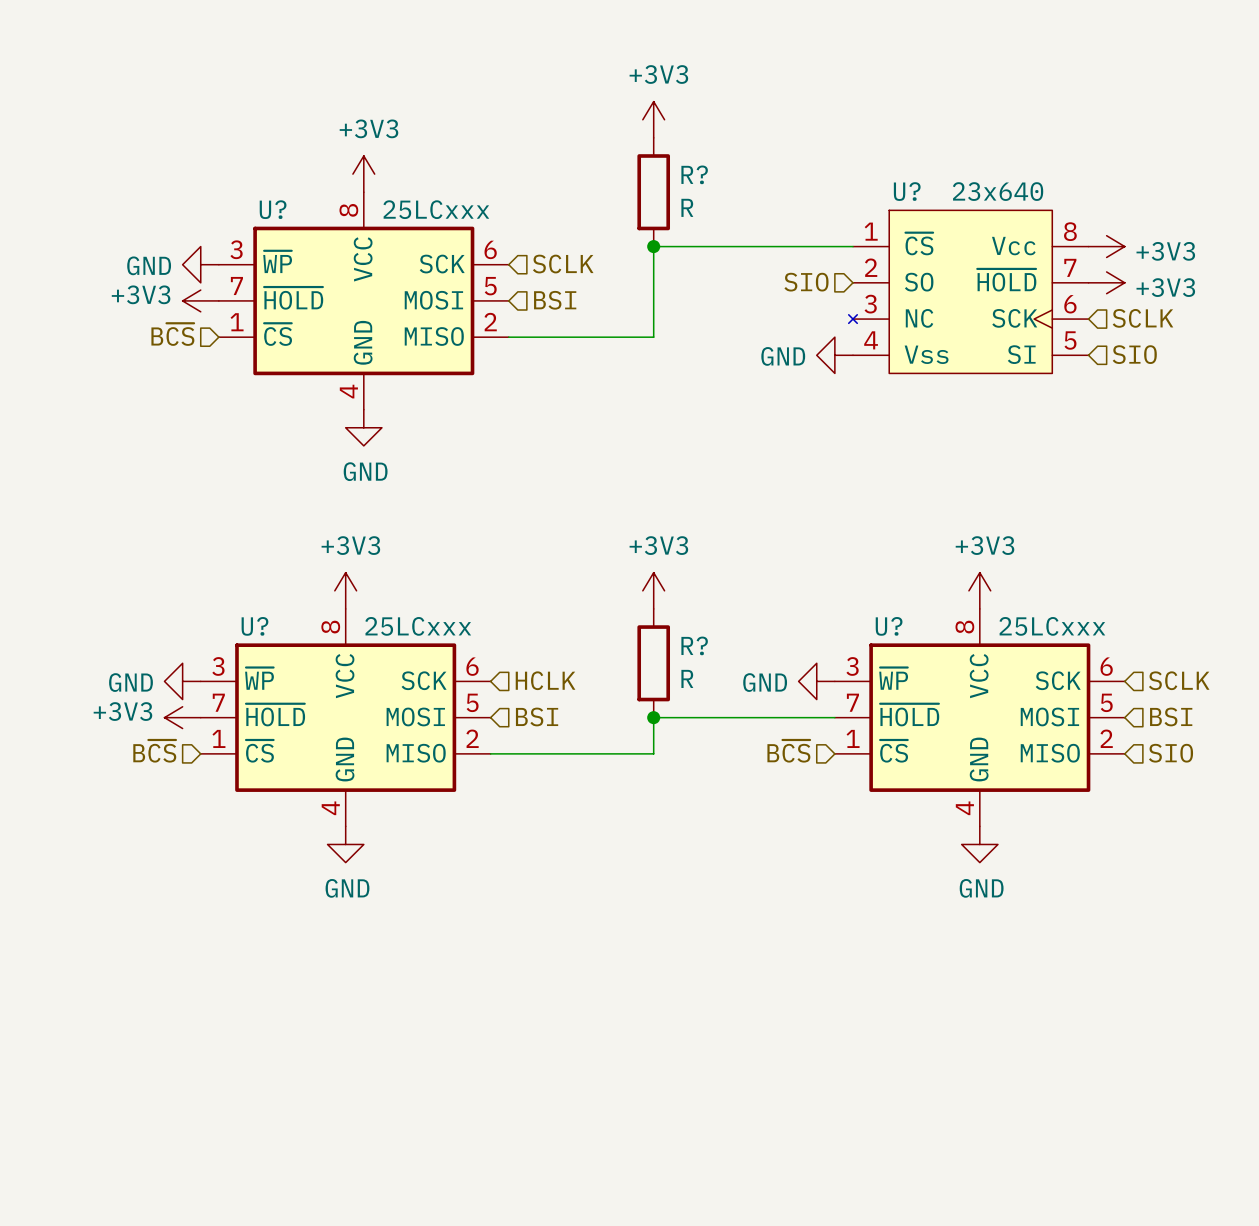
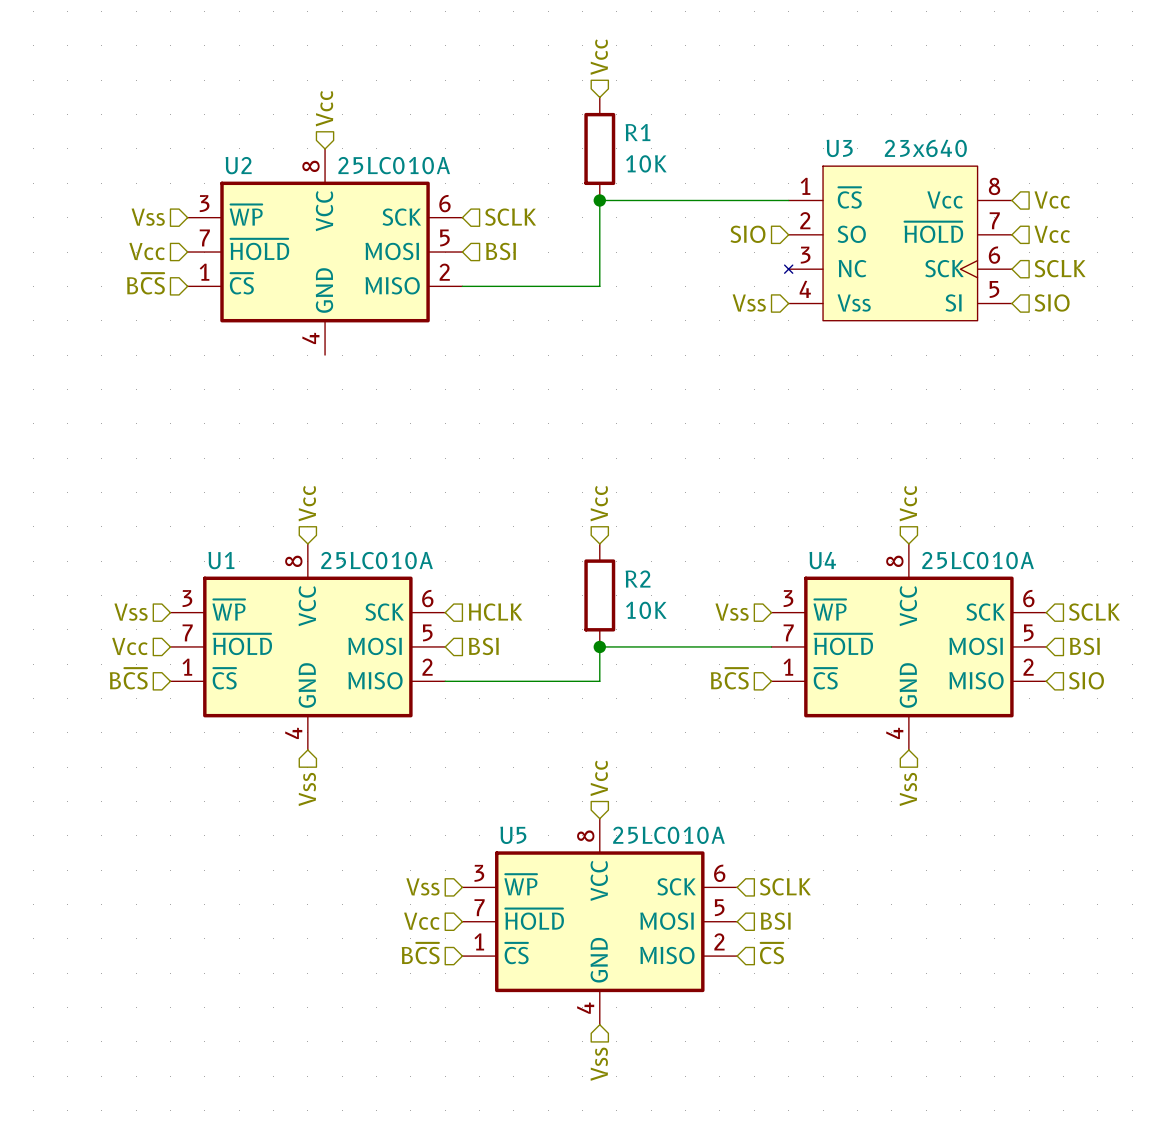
hierarchical label: none -> Vcc (599, 57)
power symbol: +3V3 (653, 119) -> none
hierarchical label: none -> Vcc (324, 108)
power symbol: +3V3 (363, 174) -> none
R? name: R? (694, 174) -> R1 (637, 132)
U? name: U? (907, 191) -> U3 (839, 148)
R? value: R (687, 207) -> 10K (646, 163)
U? name: U? (273, 209) -> U2 (238, 165)
U? value: 25LCxxx (436, 209) -> 25LC010A (394, 165)
power symbol: +3V3 (1106, 246) -> none
hierarchical label: none -> Vcc (1052, 199)
hierarchical label: none -> Vss (148, 217)
power symbol: GND (200, 264) -> none
power symbol: +3V3 (1106, 282) -> none
hierarchical label: none -> Vcc (1052, 234)
hierarchical label: none -> Vcc (147, 251)
power symbol: +3V3 (200, 300) -> none
hierarchical label: none -> Vss (749, 302)
power symbol: GND (834, 355) -> none
power symbol: GND (363, 427) -> none
hierarchical label: none -> Vcc (307, 503)
hierarchical label: none -> Vcc (599, 503)
hierarchical label: none -> Vcc (908, 503)
power symbol: +3V3 (345, 590) -> none
power symbol: +3V3 (653, 590) -> none
power symbol: +3V3 (979, 590) -> none
U? name: U? (254, 626) -> U1 (221, 560)
U? value: 25LCxxx (418, 626) -> 25LC010A (377, 560)
U? name: U? (889, 626) -> U4 (822, 560)
U? value: 25LCxxx (1052, 626) -> 25LC010A (978, 560)
R? name: R? (694, 645) -> R2 (638, 579)
R? value: R (687, 678) -> 10K (646, 610)
hierarchical label: none -> Vss (131, 612)
hierarchical label: none -> Vss (732, 612)
power symbol: GND (182, 681) -> none
power symbol: GND (816, 681) -> none
hierarchical label: none -> Vcc (129, 646)
power symbol: +3V3 (182, 717) -> none
power symbol: GND (345, 844) -> none
power symbol: GND (979, 844) -> none
hierarchical label: none -> Vcc (599, 778)
hierarchical label: none -> Vss (307, 789)
hierarchical label: none -> Vss (908, 789)
hierarchical label: none -> Vss (422, 886)
hierarchical label: none -> SCLK (785, 886)
hierarchical label: none -> BSI (775, 921)
hierarchical label: none -> Vcc (421, 921)
U5: none -> 25LC010A (599, 921)
hierarchical label: none -> B~{CS} (420, 953)
hierarchical label: none -> ~{CS} (771, 953)
hierarchical label: none -> Vss (599, 1064)

